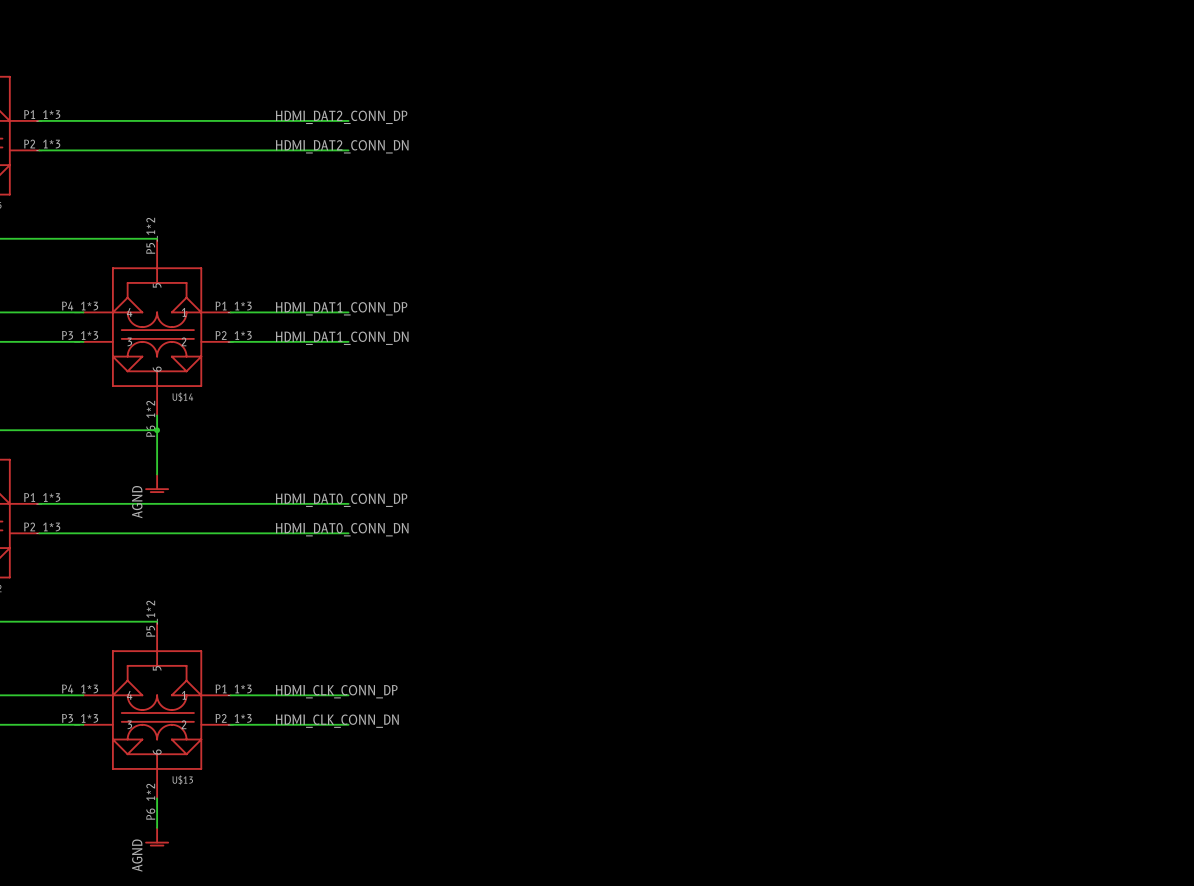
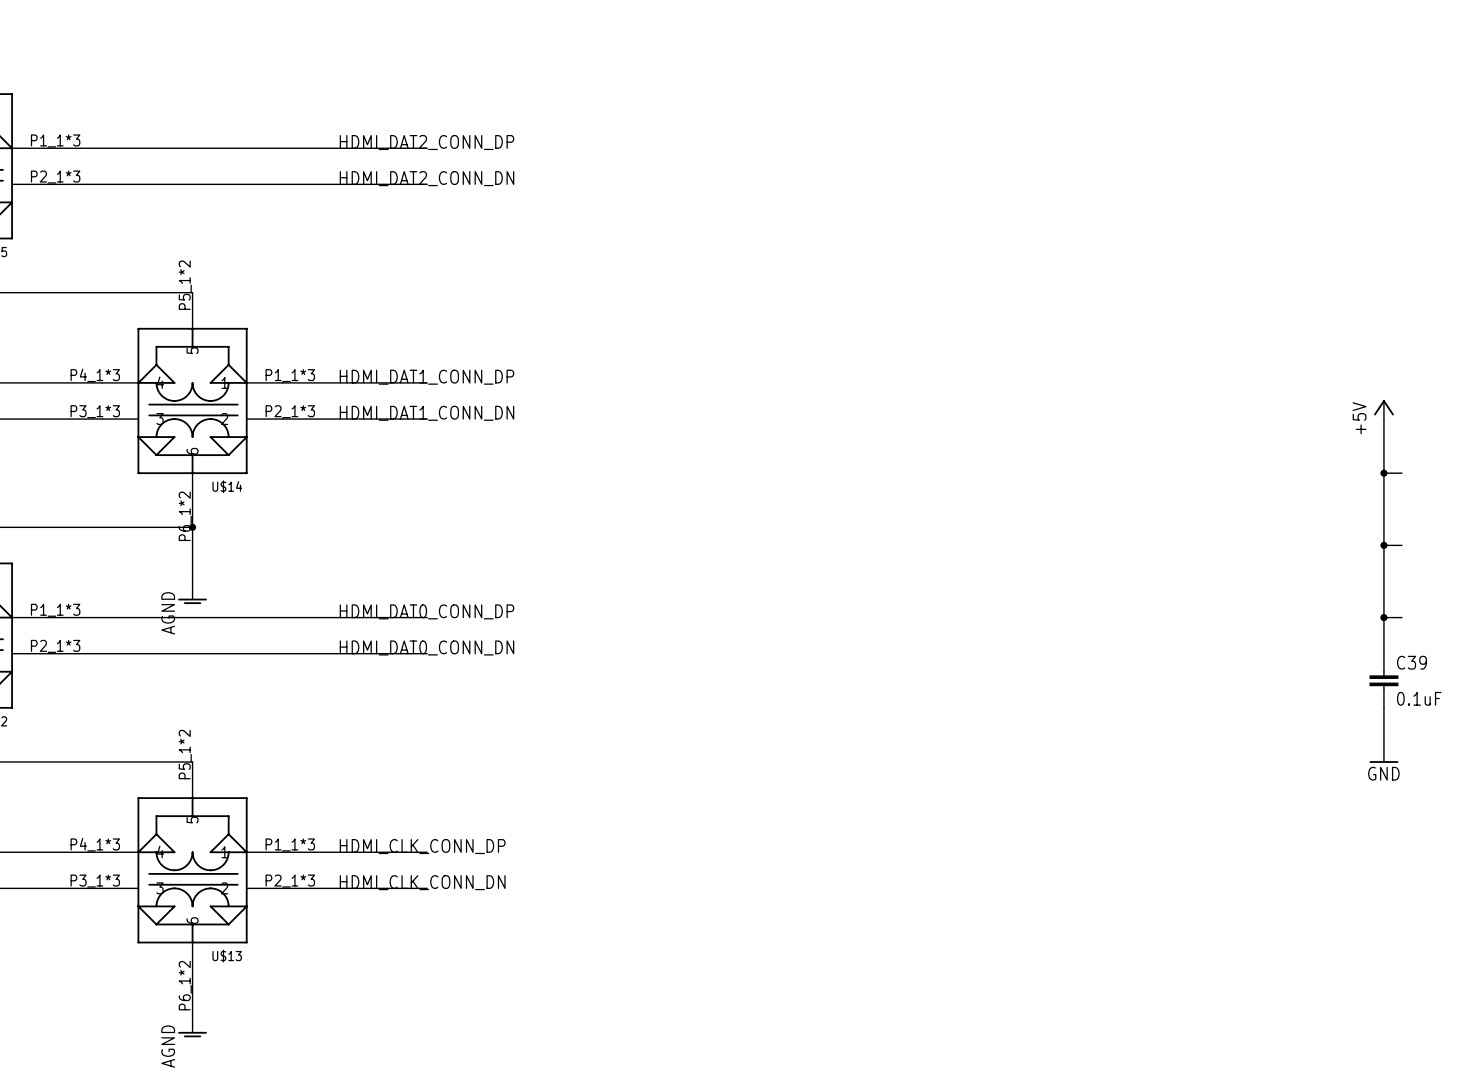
power symbol: none -> +5V (1383, 409)
wire: none -> (1383, 419) (1383, 653)
wire: none -> (1383, 473) (1402, 473)
junction: none -> (1383, 473)
wire: none -> (1383, 545) (1402, 545)
junction: none -> (1383, 545)
wire: none -> (1383, 617) (1402, 617)
junction: none -> (1383, 617)
C39: none -> 0.1uF (1383, 680)
wire: none -> (1383, 707) (1383, 743)
power symbol: none -> GND (1383, 753)

